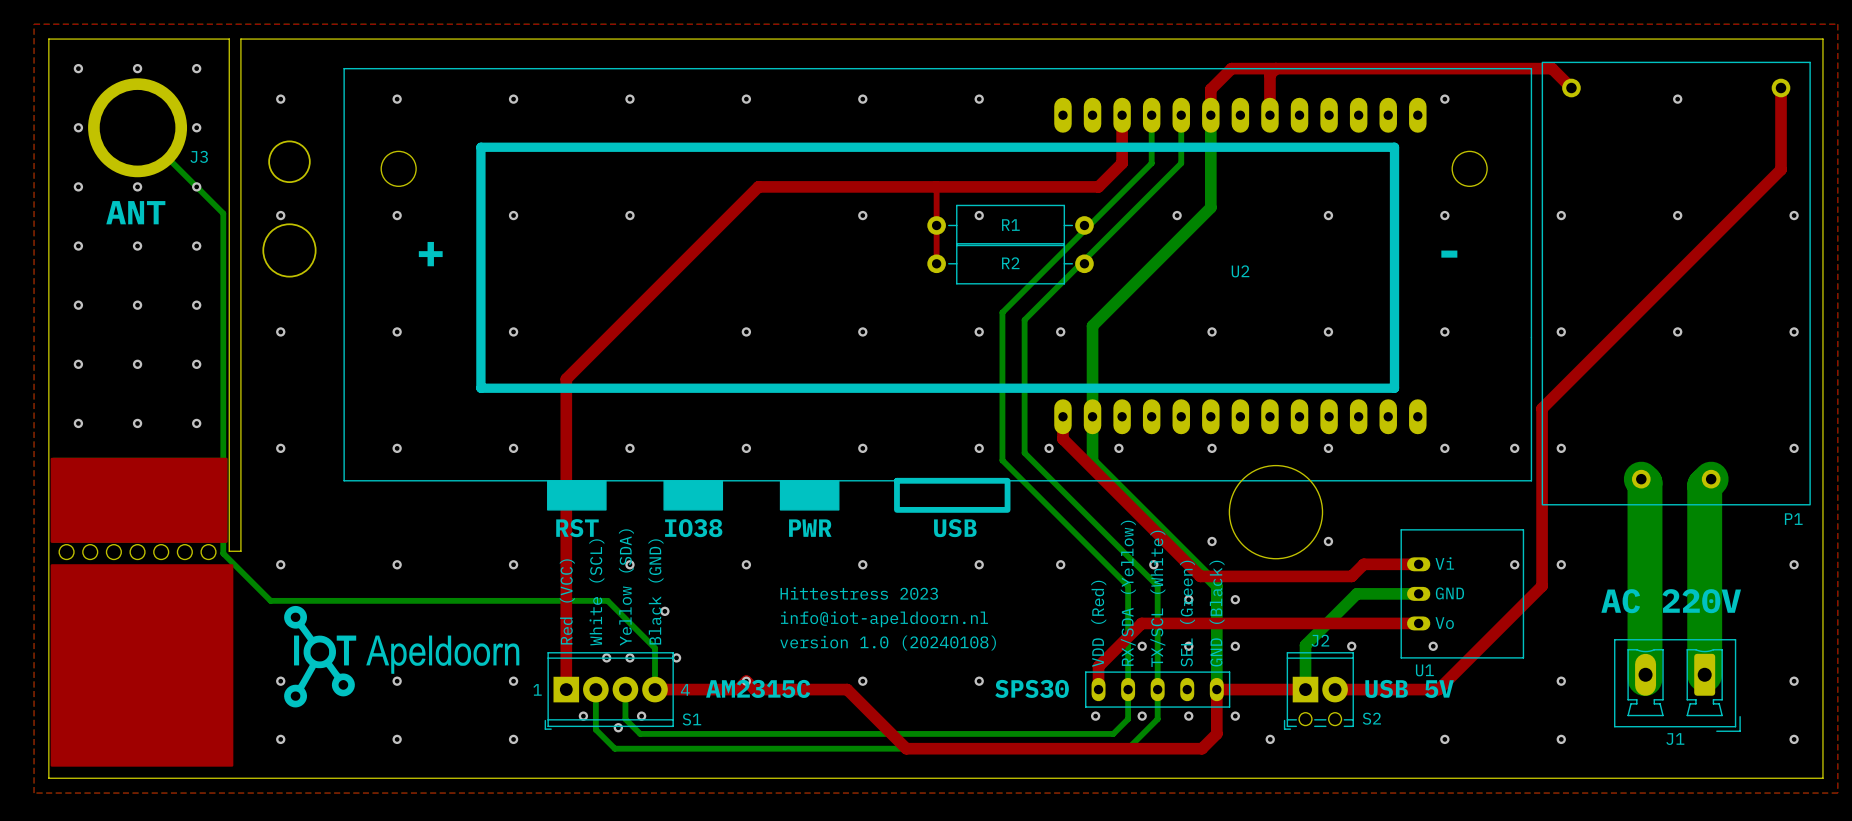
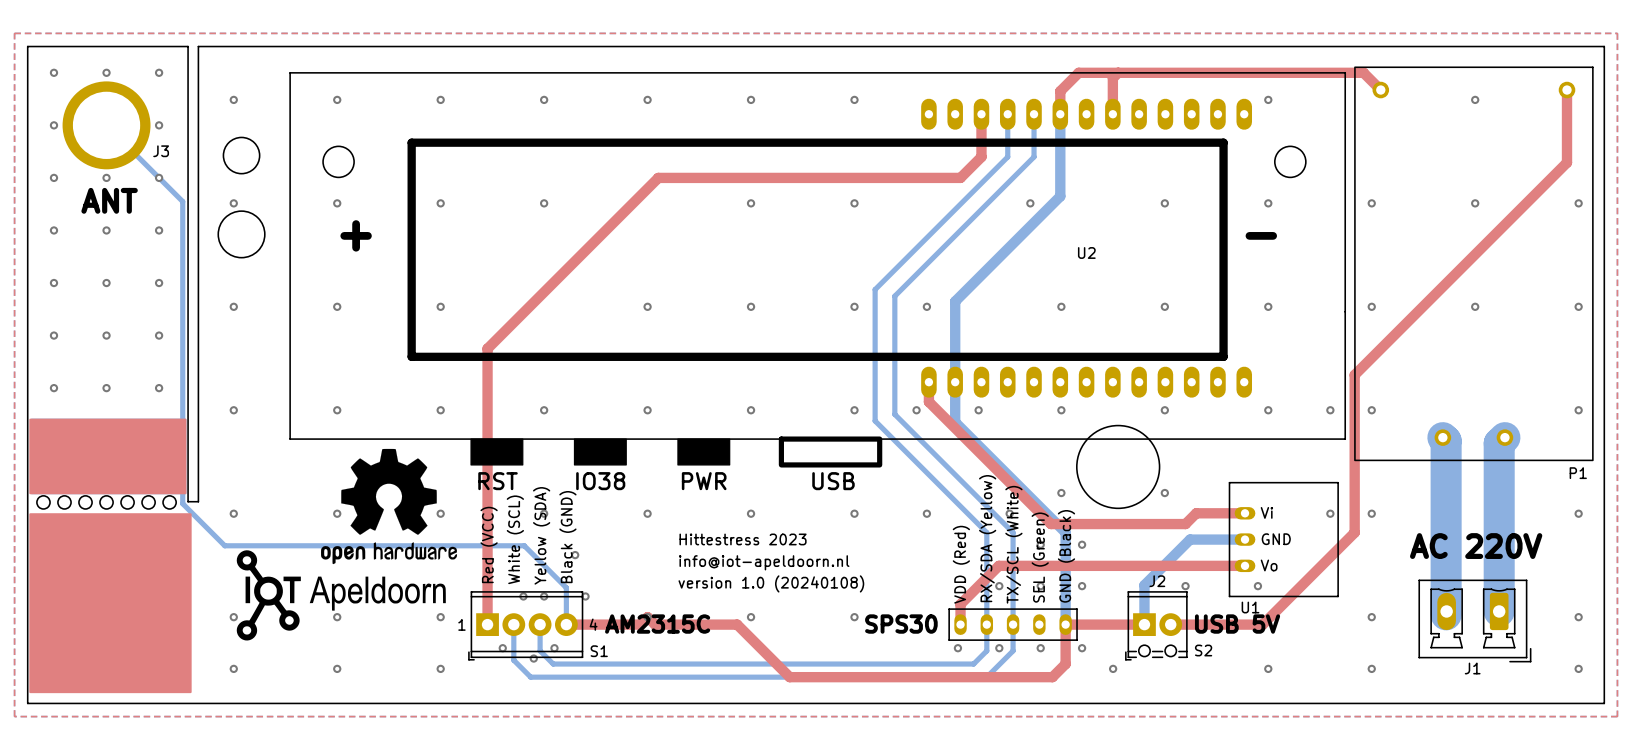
top track: (935, 186) (936, 263) -> none
R1: (1010, 225) -> none
R2: (1010, 263) -> none
drawing: none -> [321, 448, 458, 565]

